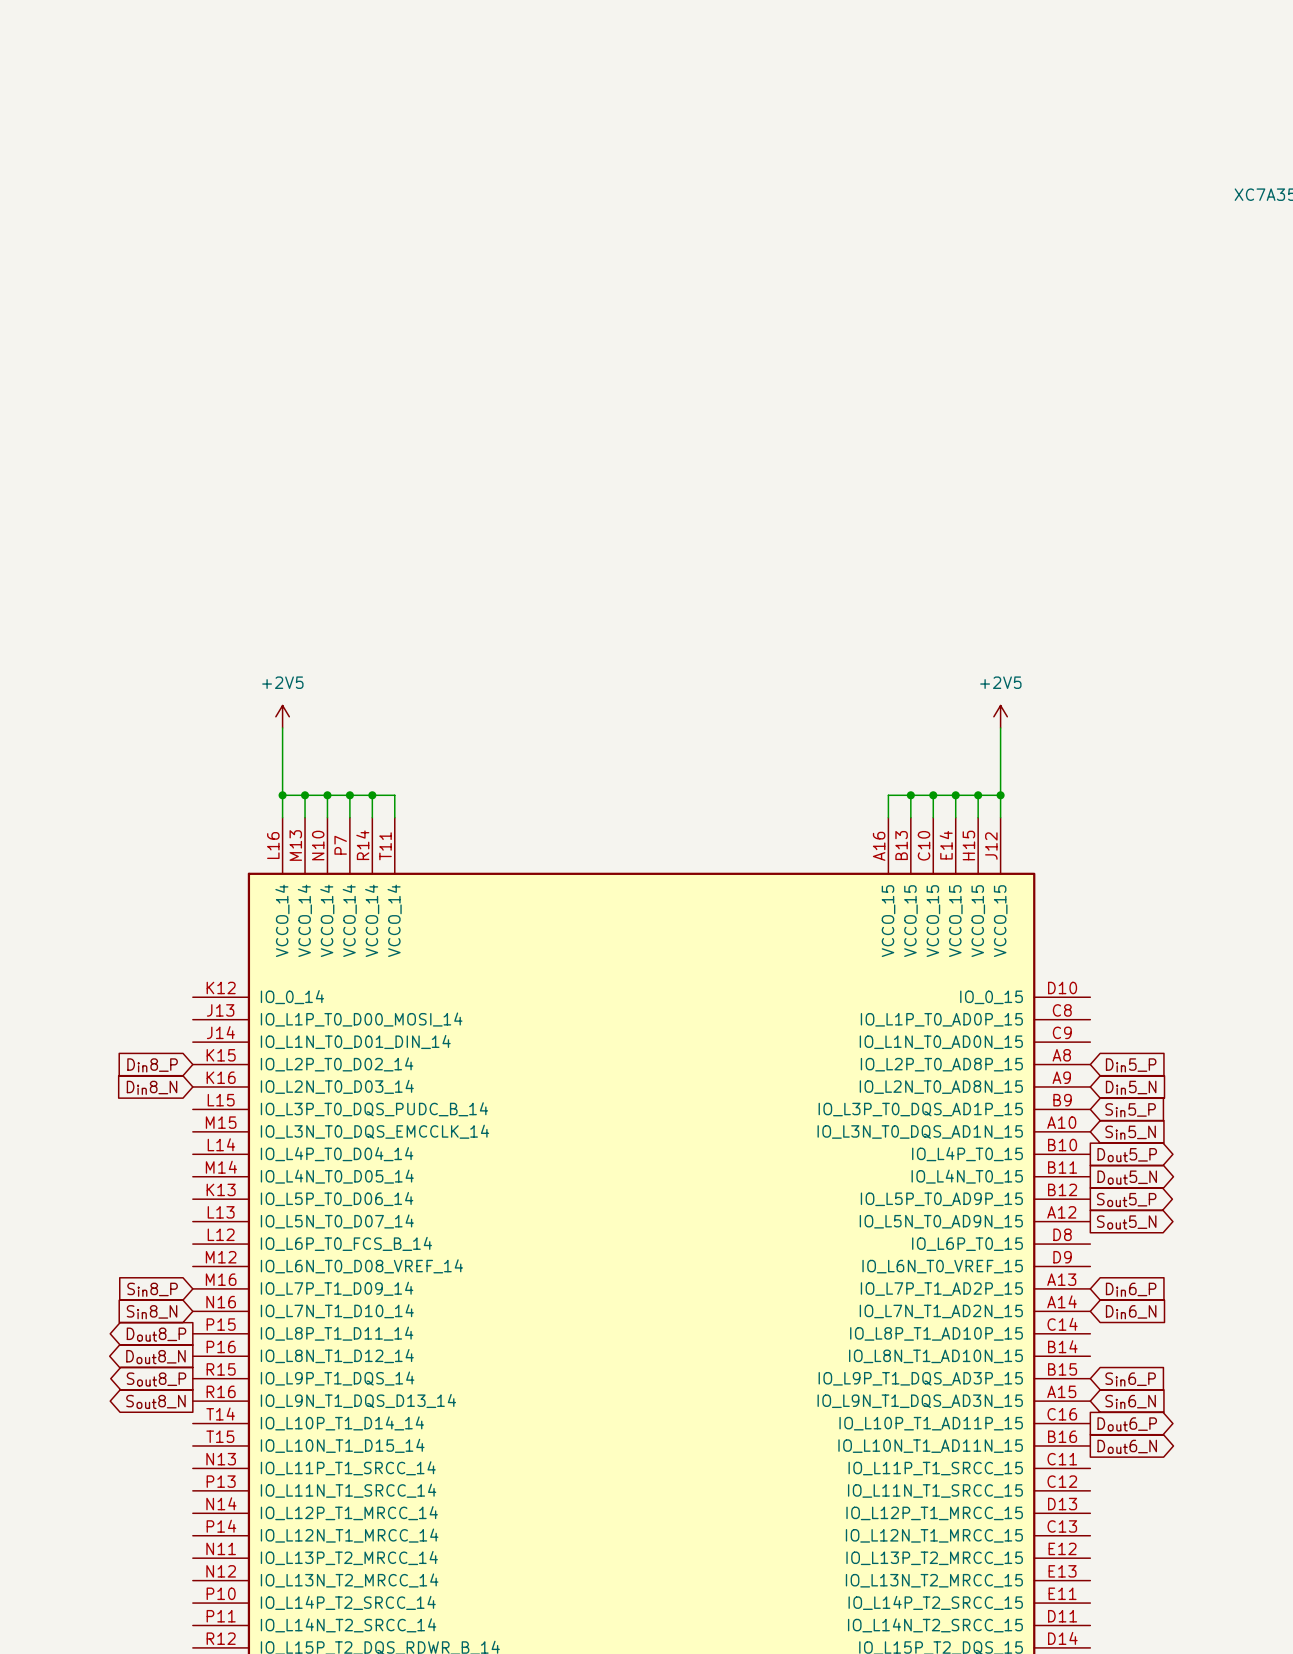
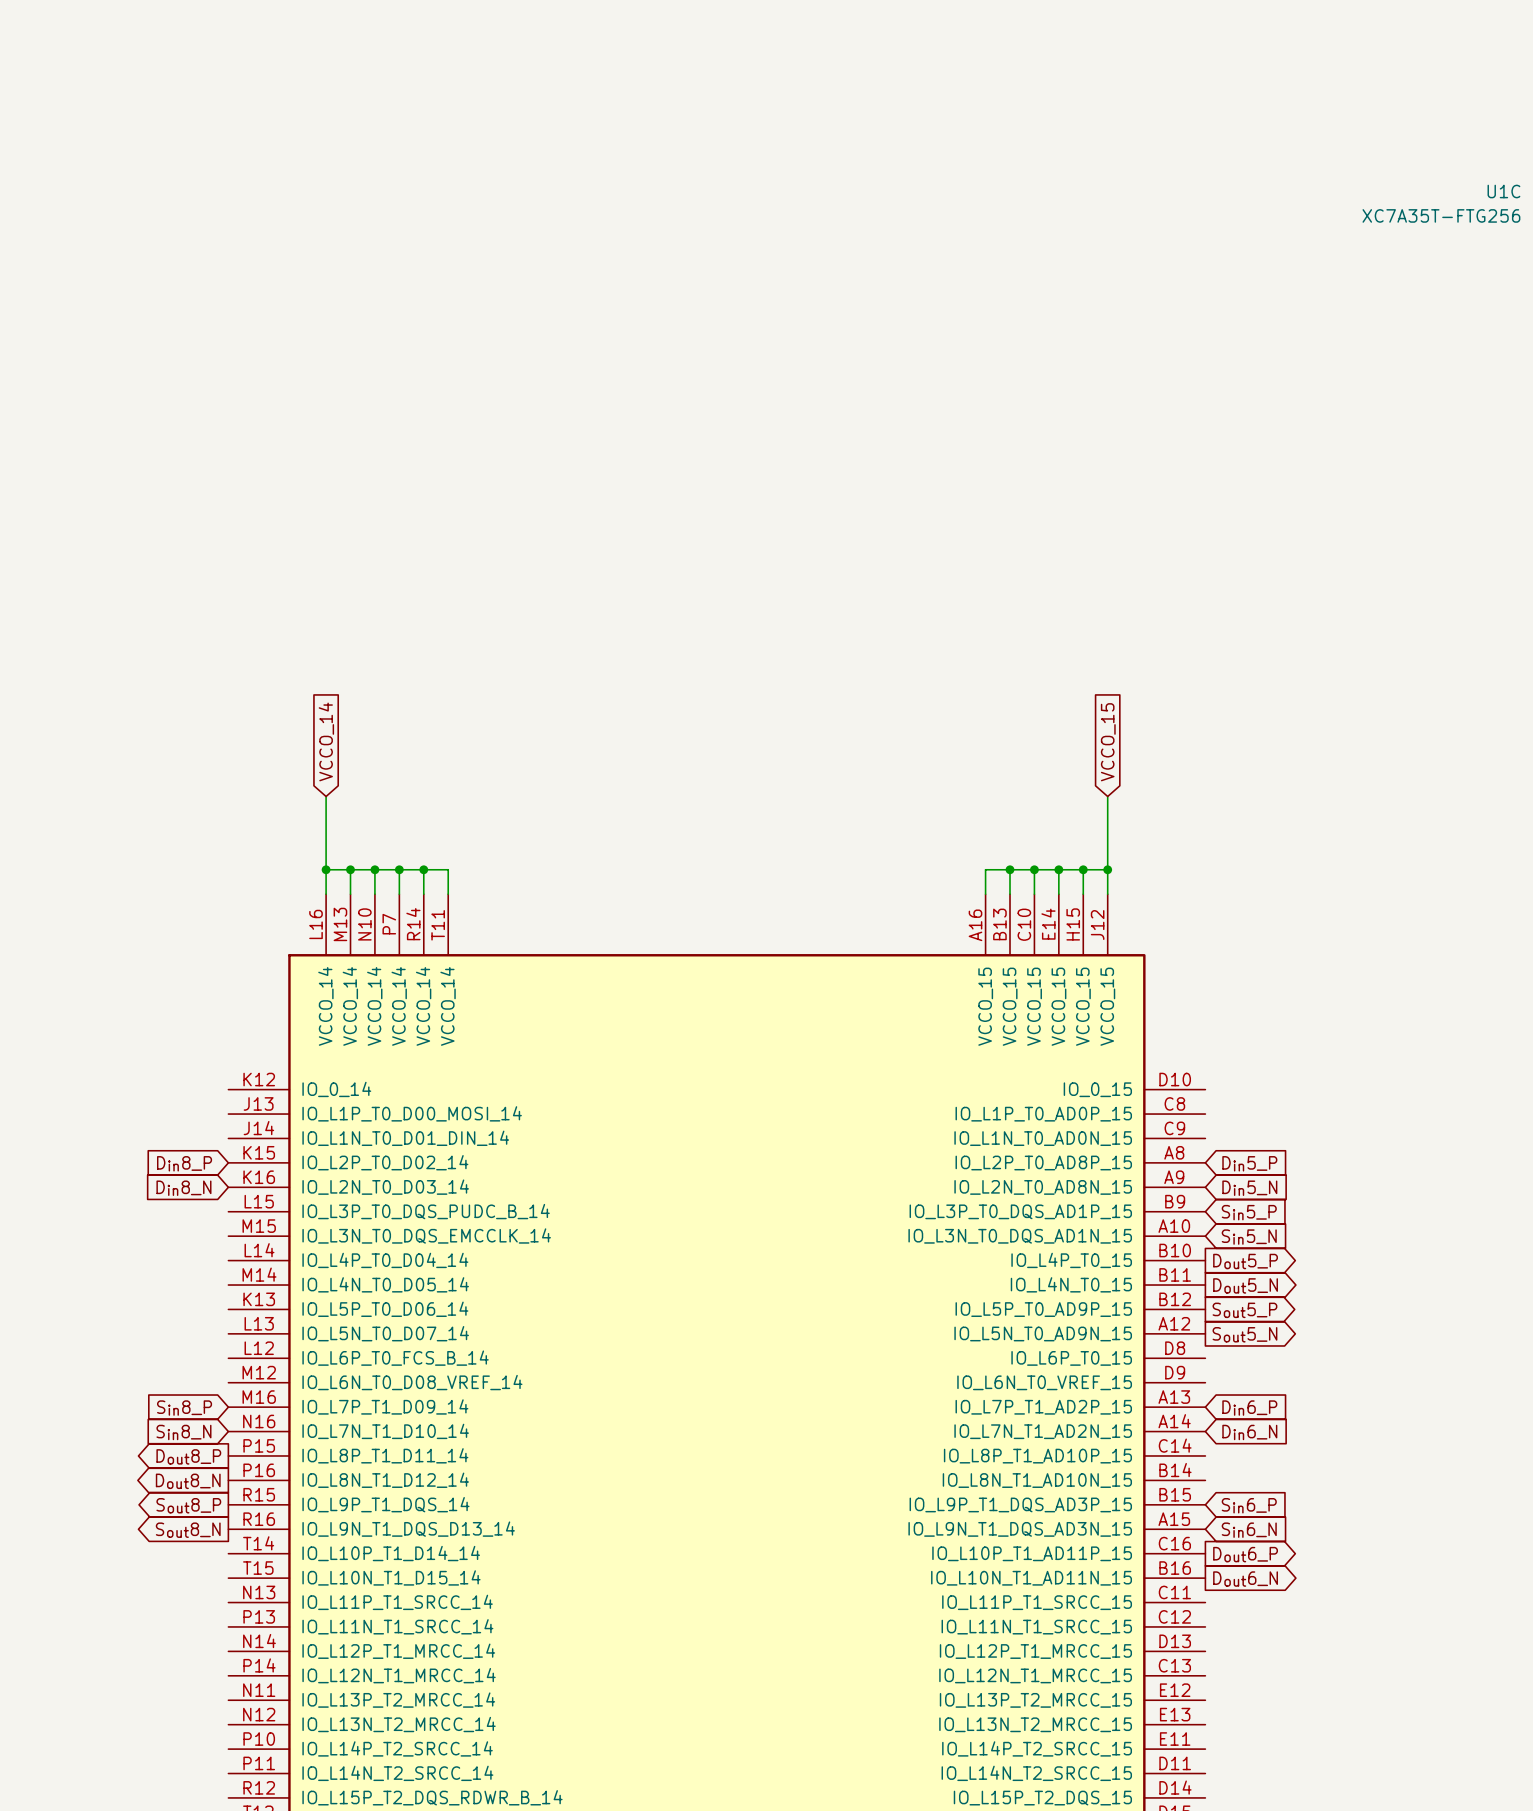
global label: none -> VCCO_14 (326, 741)
global label: none -> VCCO_15 (1108, 742)
power symbol: +2V5 (282, 716) -> none
power symbol: +2V5 (1000, 716) -> none

